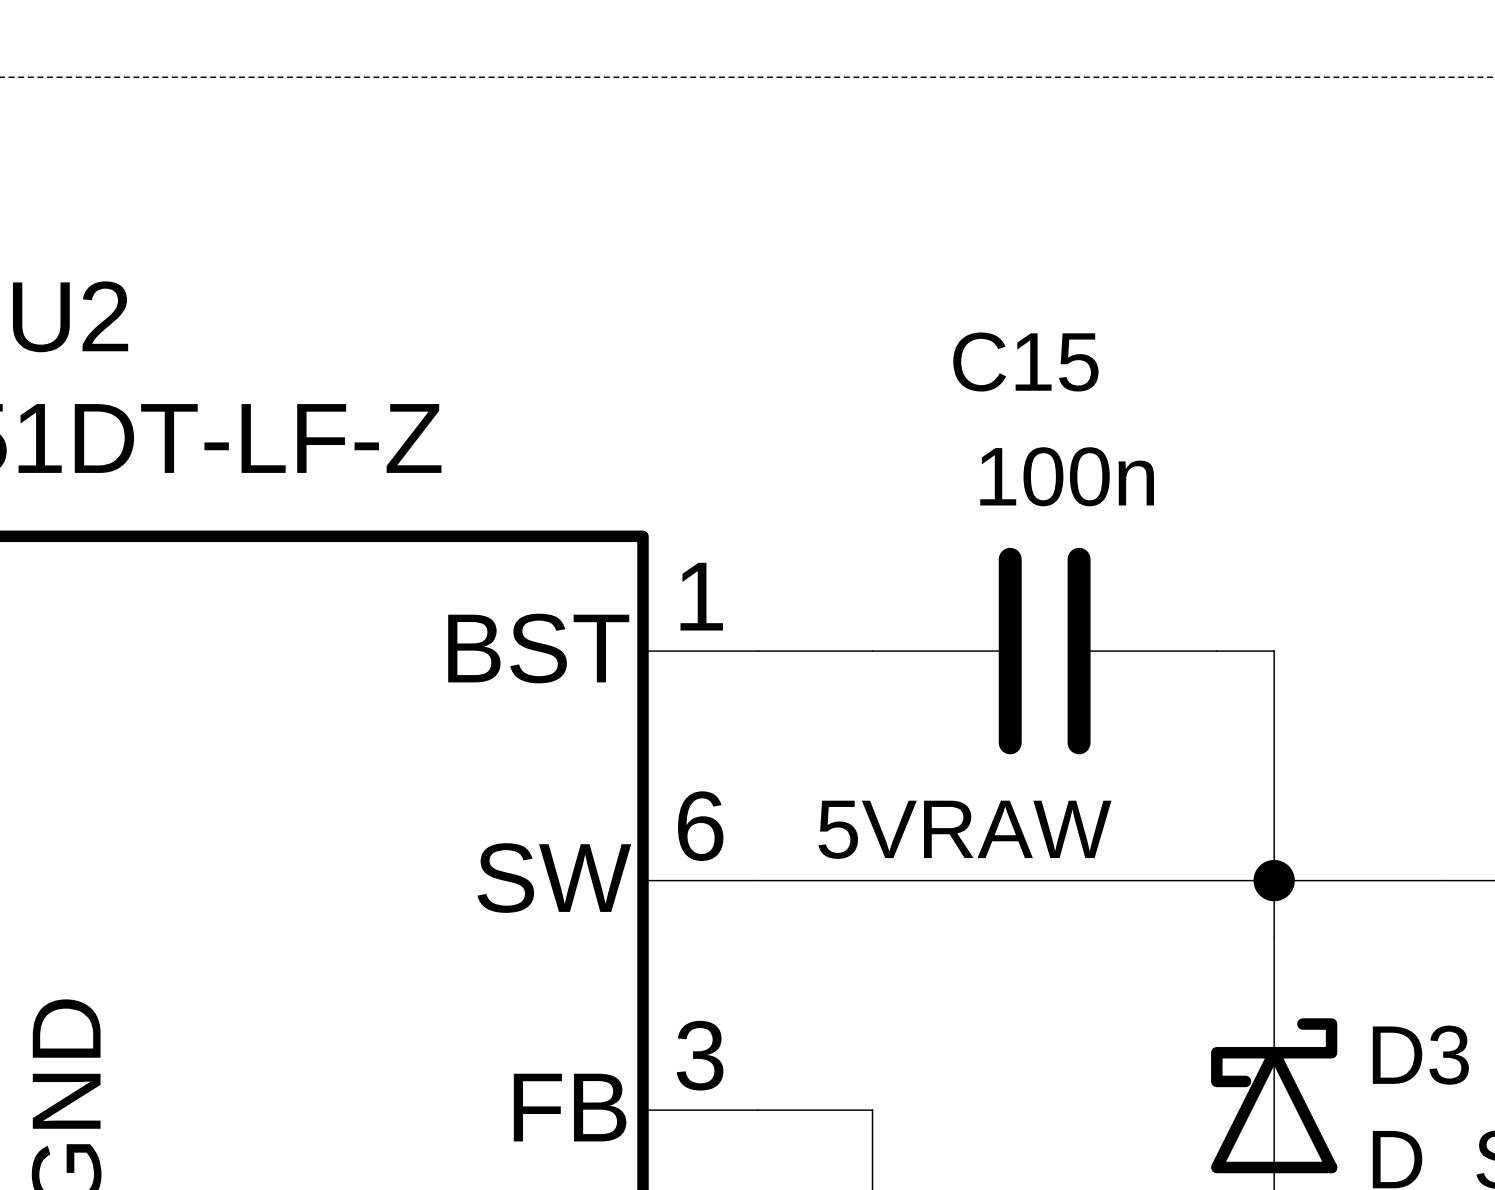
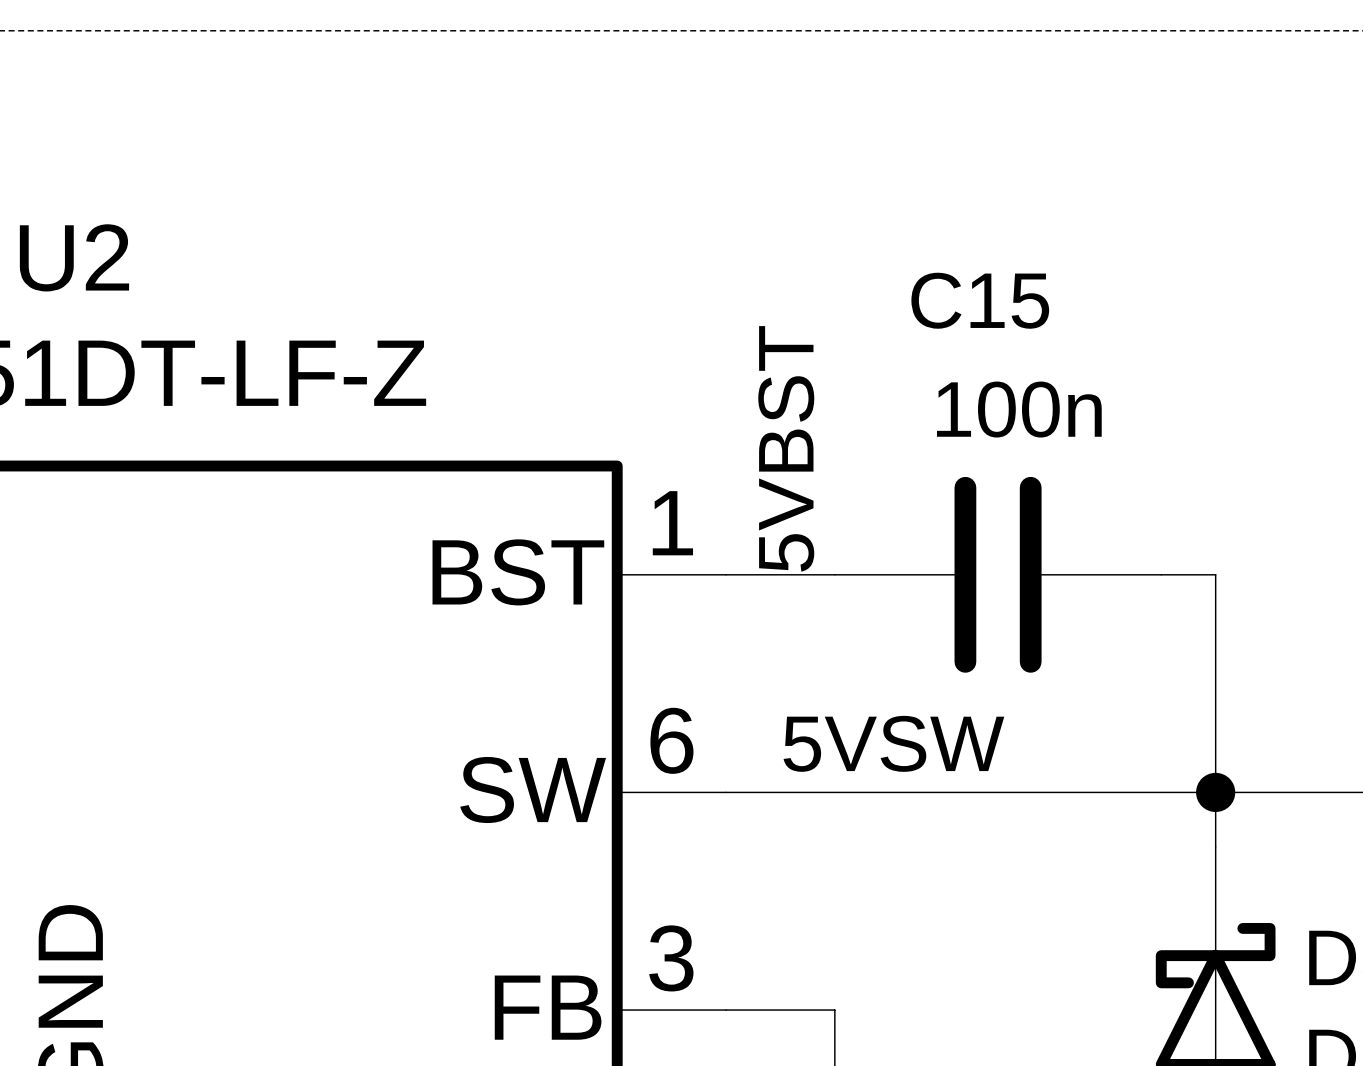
label: none -> 5VBST (786, 448)
label: 5VRAW (964, 829) -> 5VSW (893, 743)

